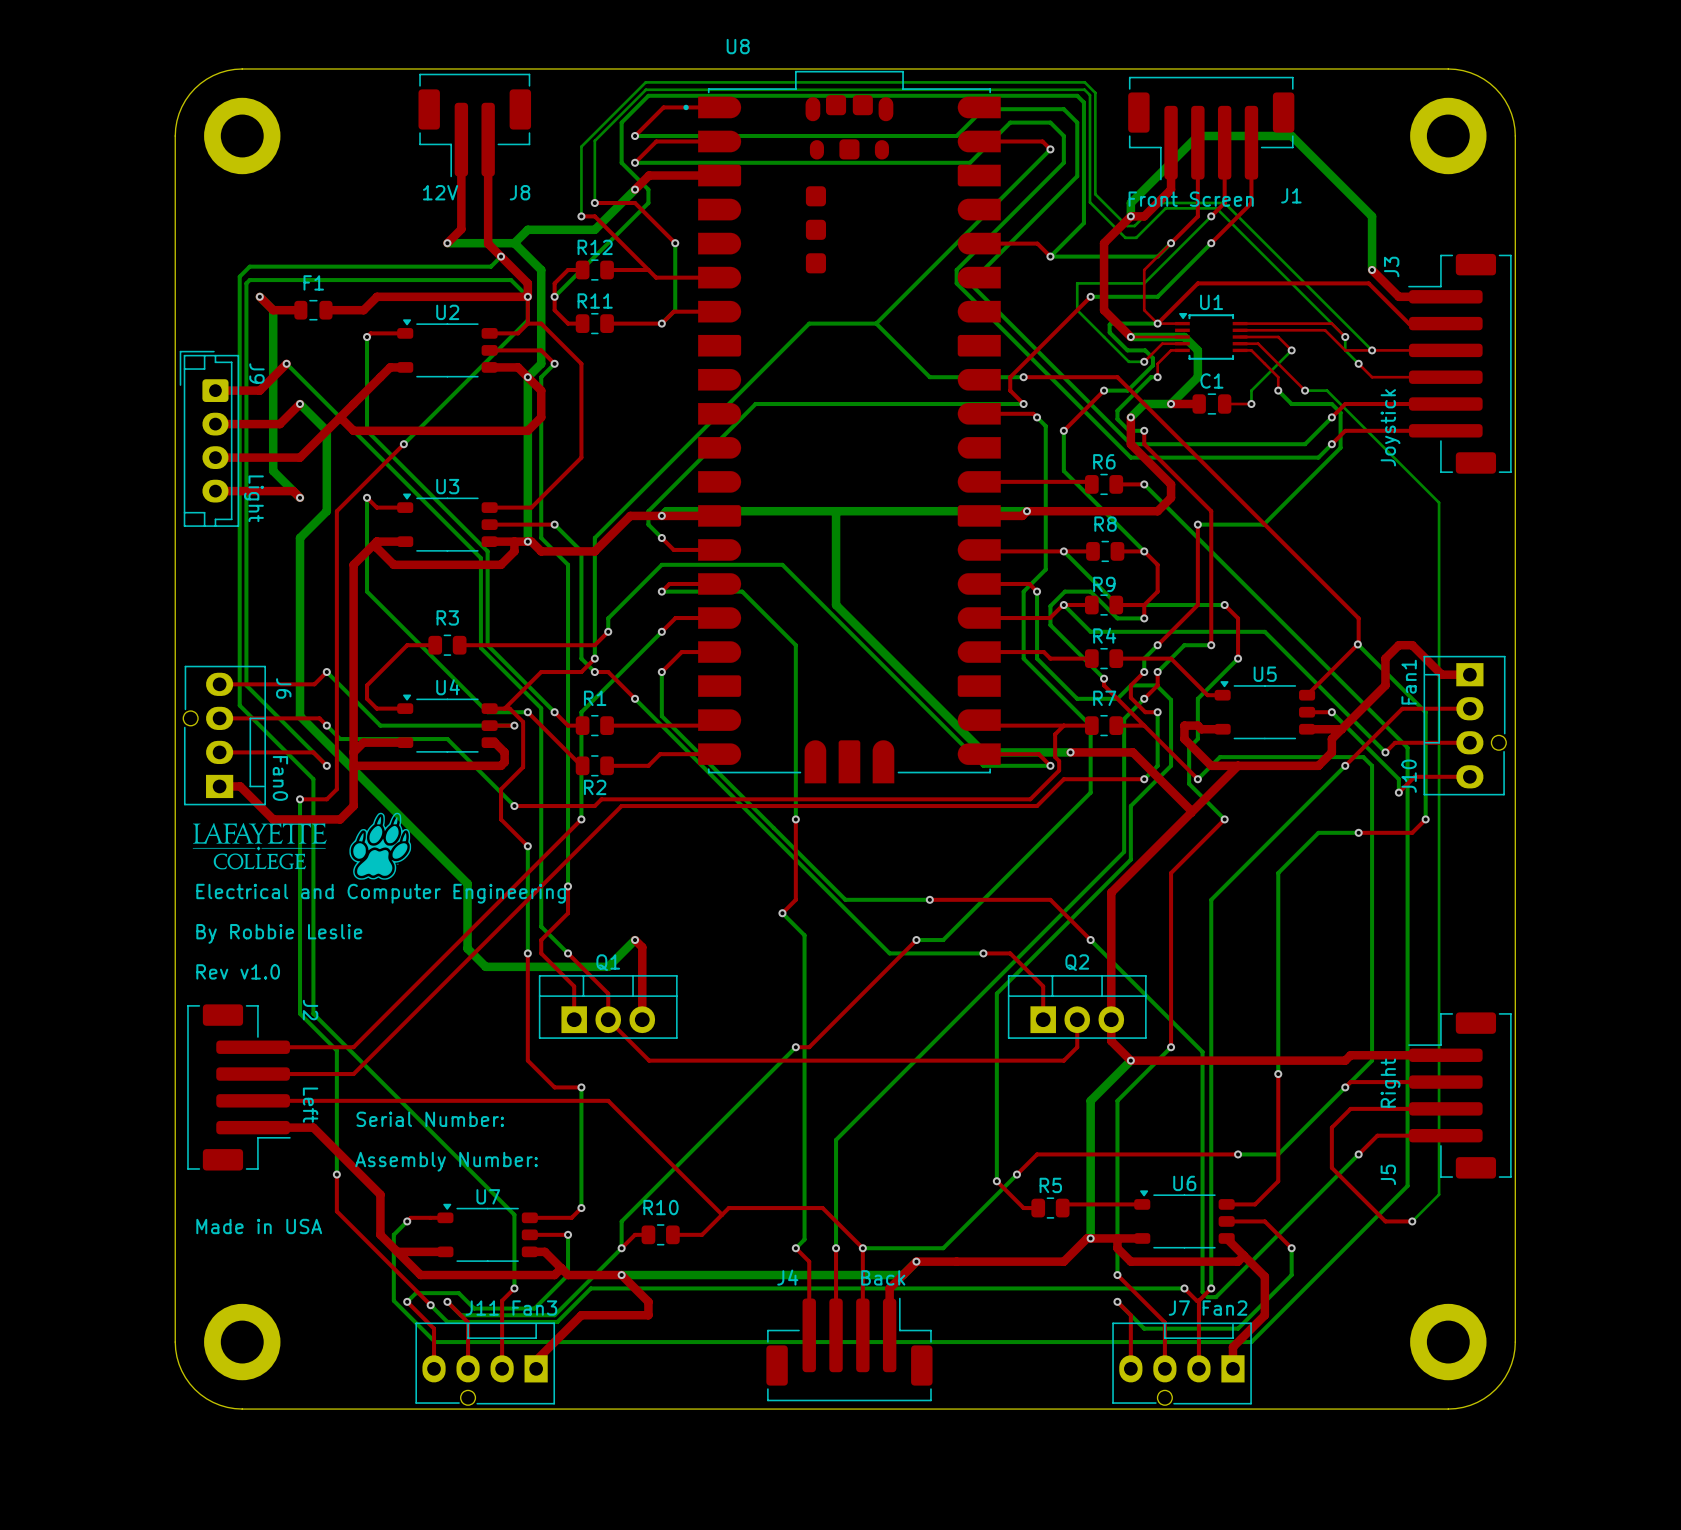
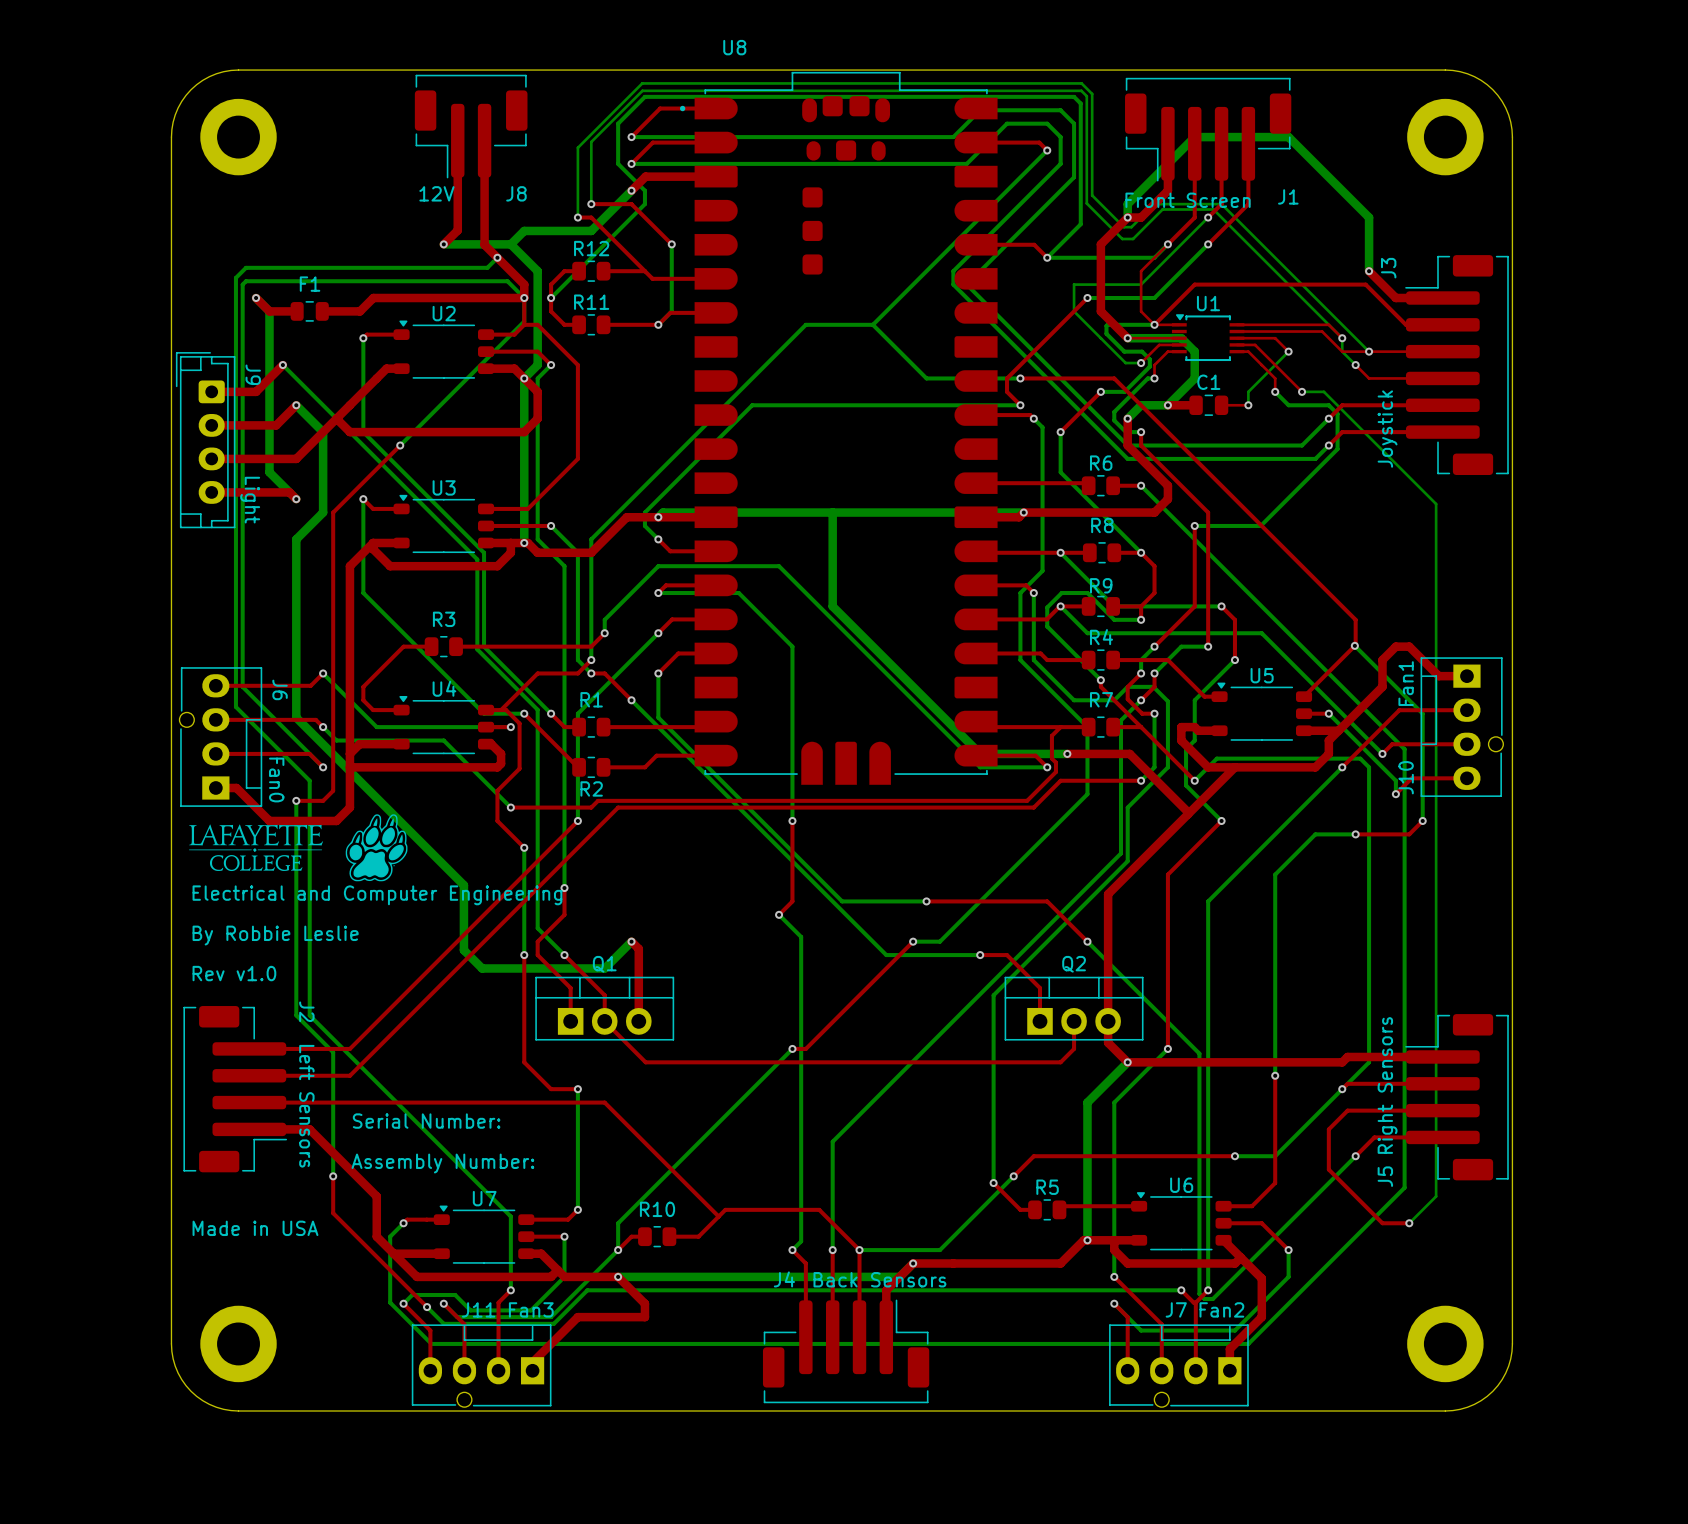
J5 text: Right (1390, 1083) -> Right Sensors (1387, 1085)
J2 text: Left (310, 1105) -> Left Sensors (306, 1106)
J4 text: Back (883, 1277) -> Back Sensors (879, 1279)

